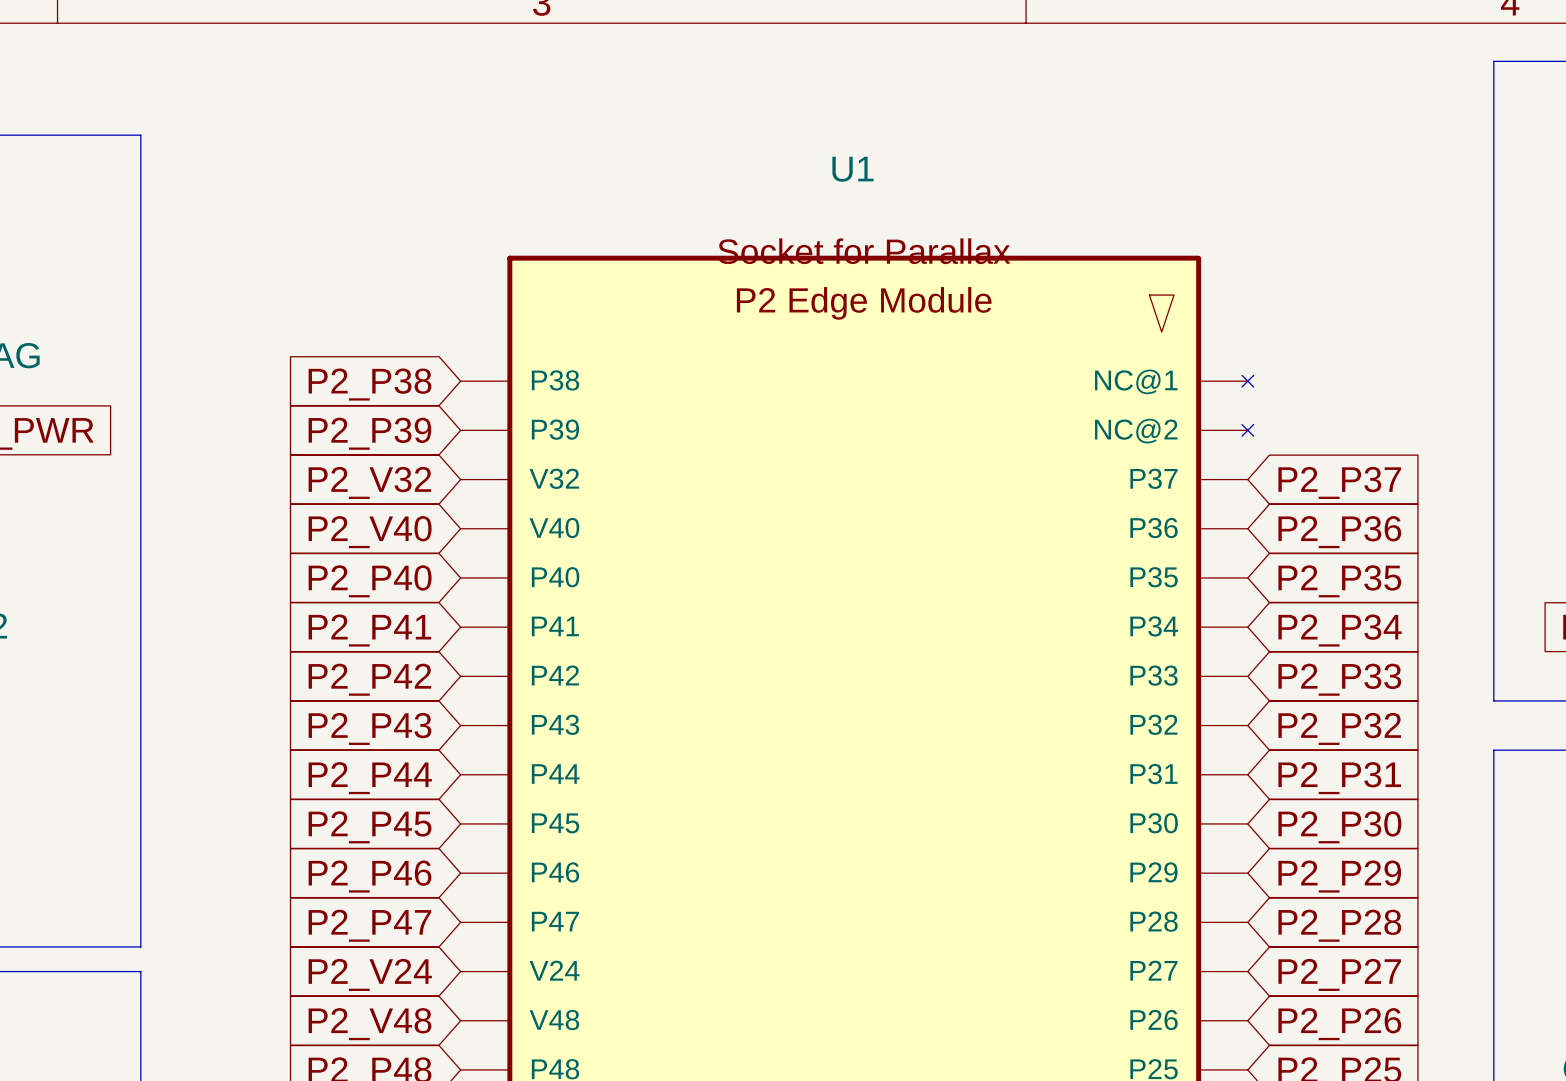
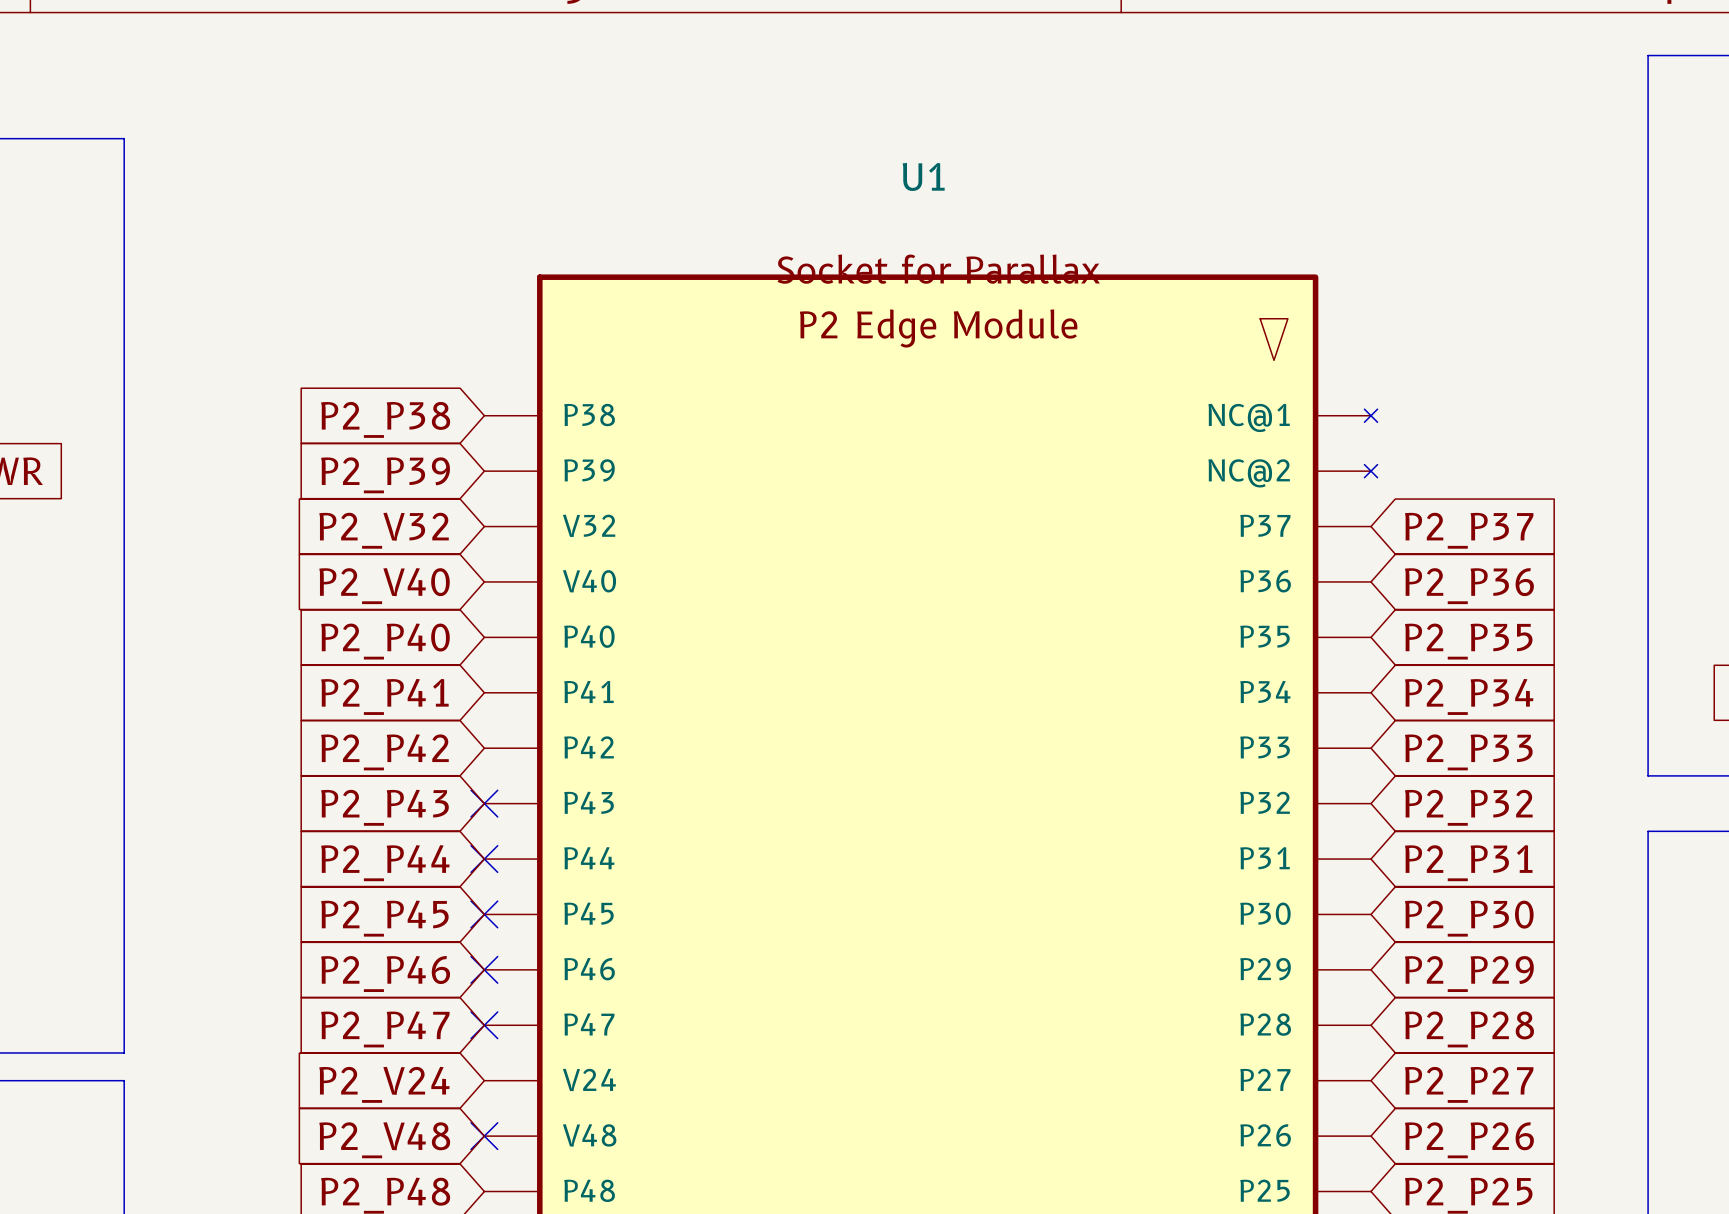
no-connect mark: none -> (484, 803)
no-connect mark: none -> (484, 859)
no-connect mark: none -> (484, 914)
no-connect mark: none -> (484, 969)
no-connect mark: none -> (484, 1025)
no-connect mark: none -> (484, 1136)

